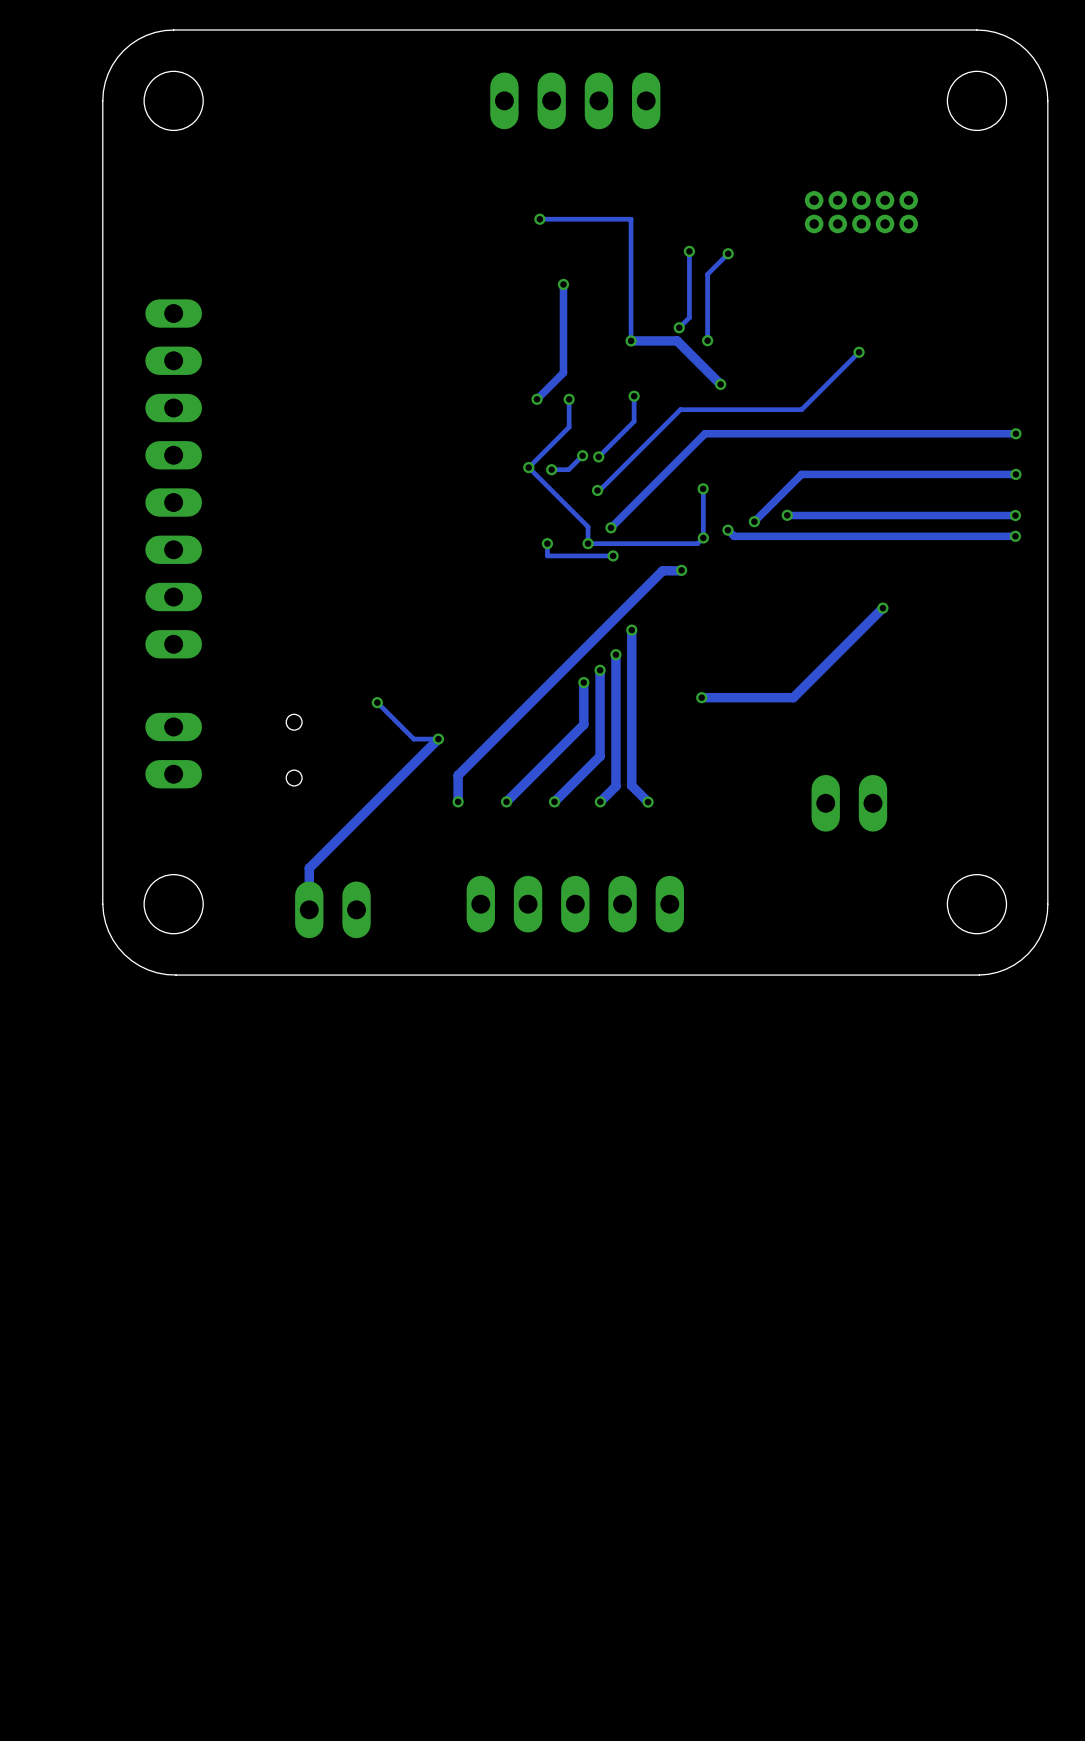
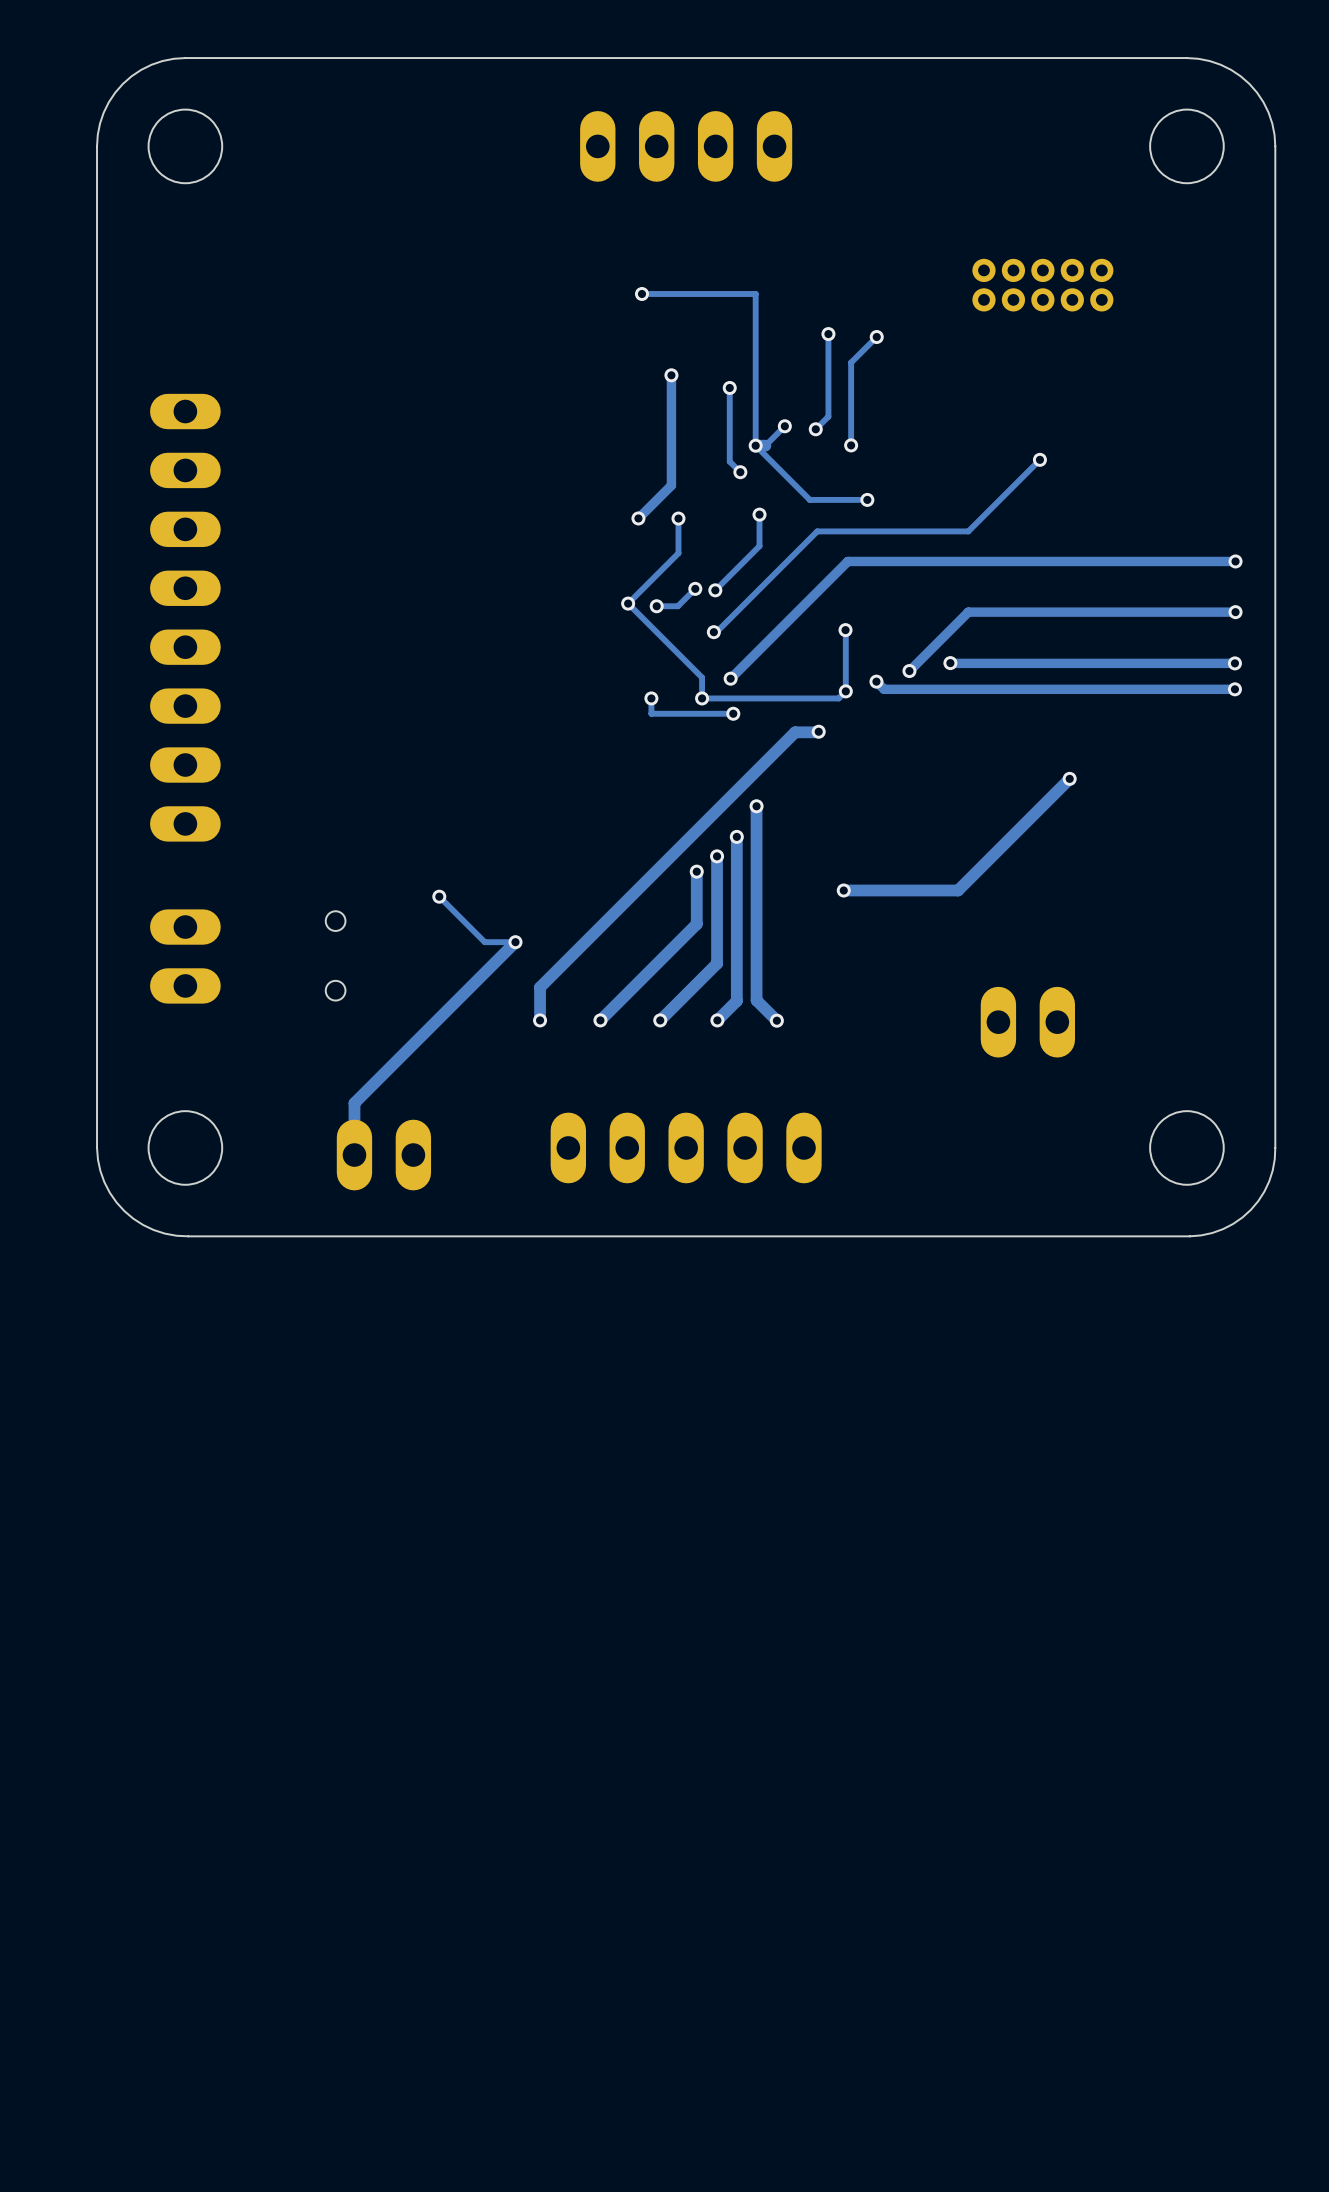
track: none -> (729, 387) (729, 461) (740, 472)
via: none -> (729, 387)
track: none -> (784, 426) (765, 445)
via: none -> (784, 426)
track: (638, 340) (677, 340) (720, 384) -> (755, 445) (809, 499) (867, 499)
via: none -> (740, 472)

